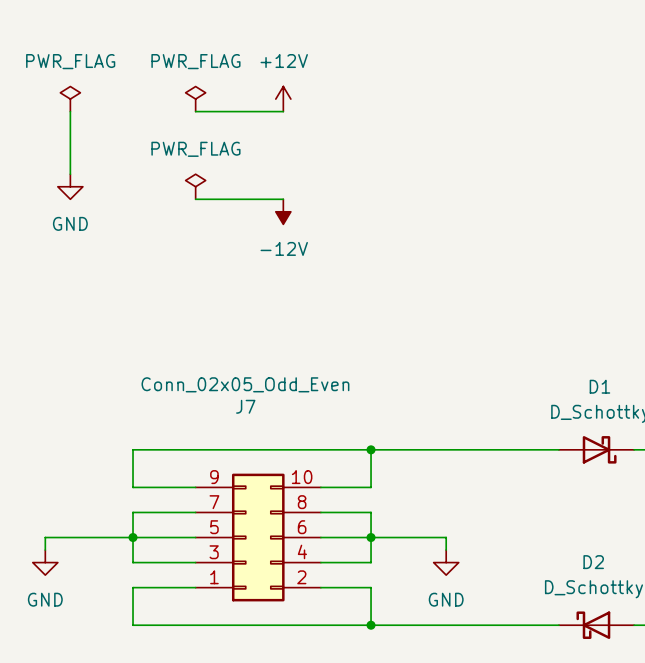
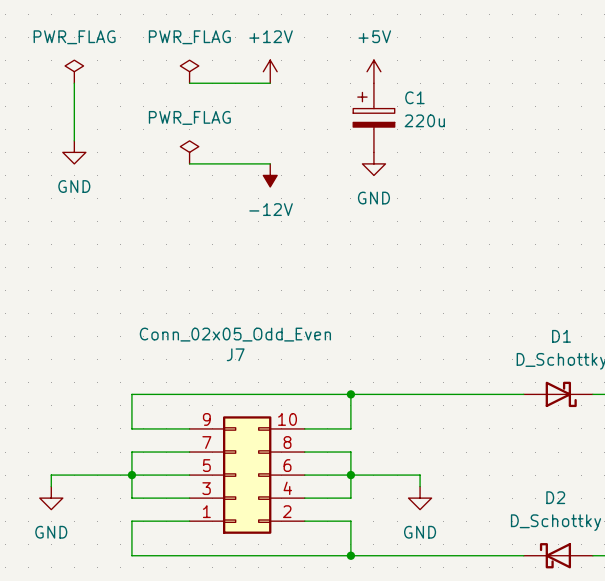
power symbol: none -> +5V (373, 71)
C1: none -> 220u (373, 117)
power symbol: none -> GND (373, 163)

